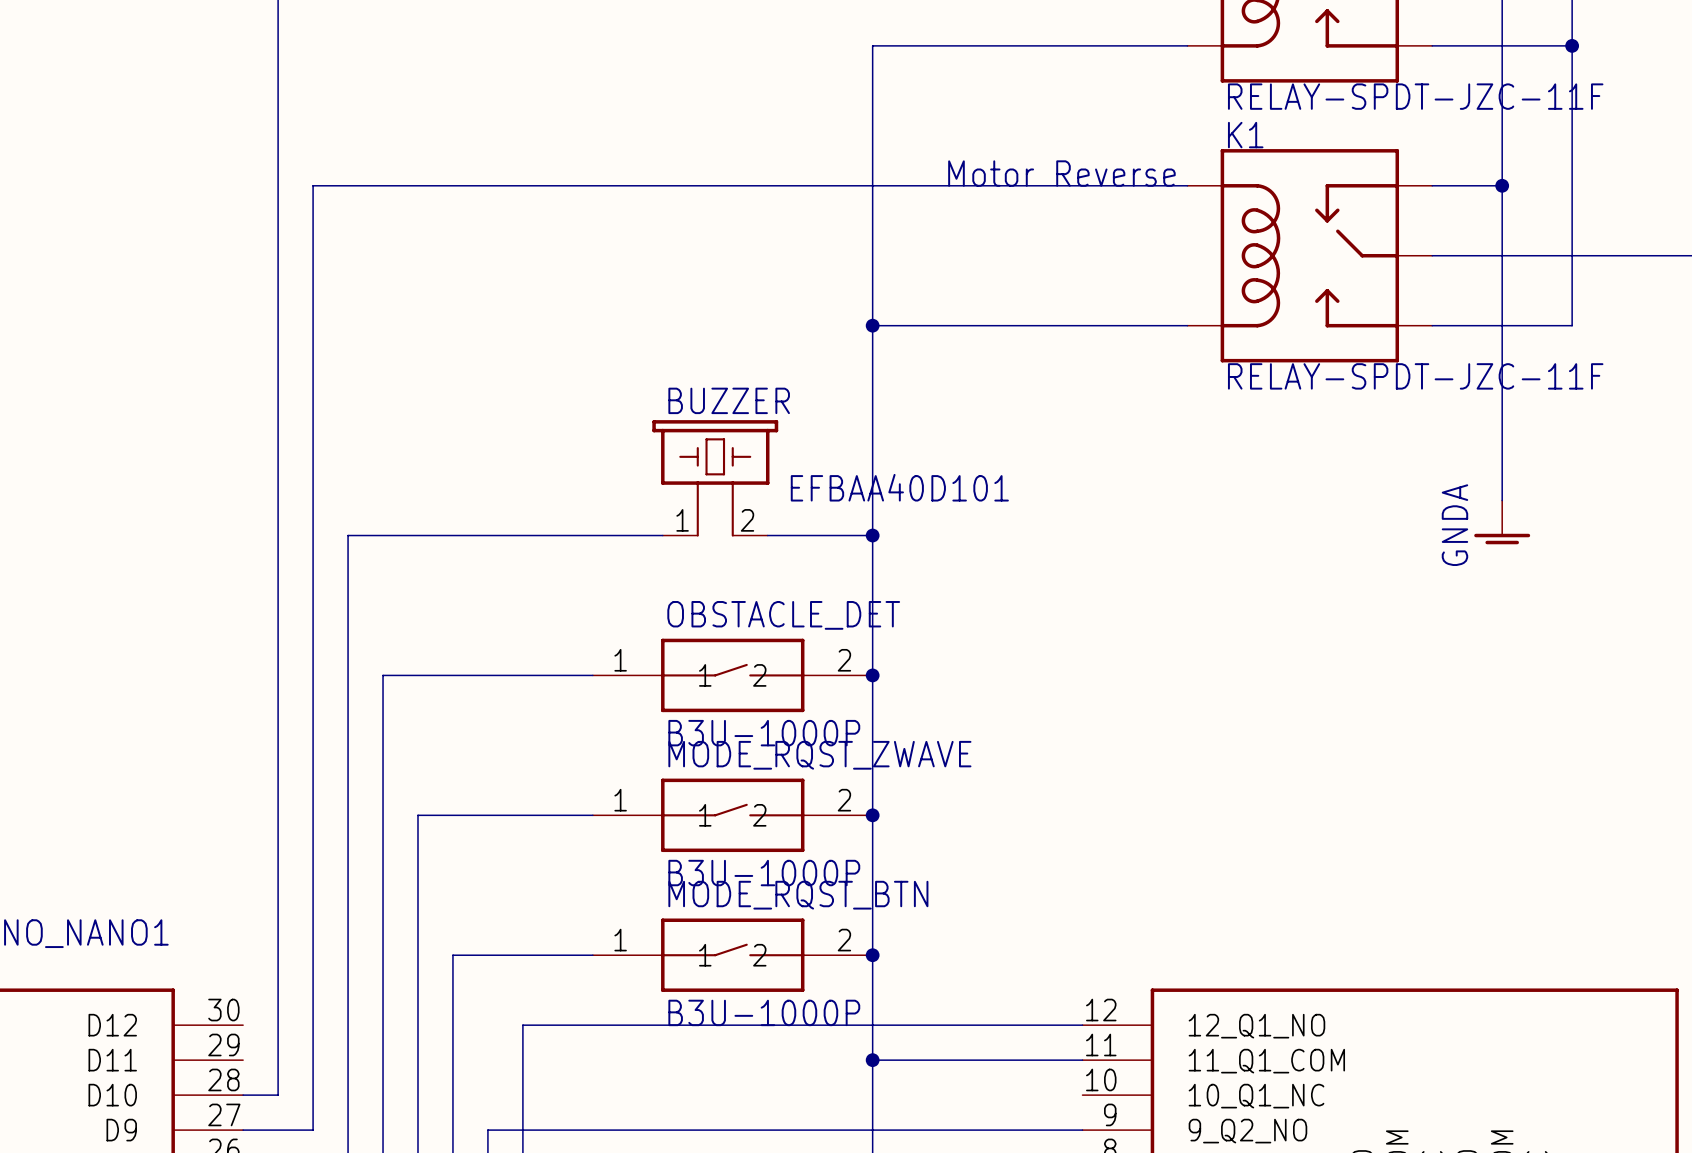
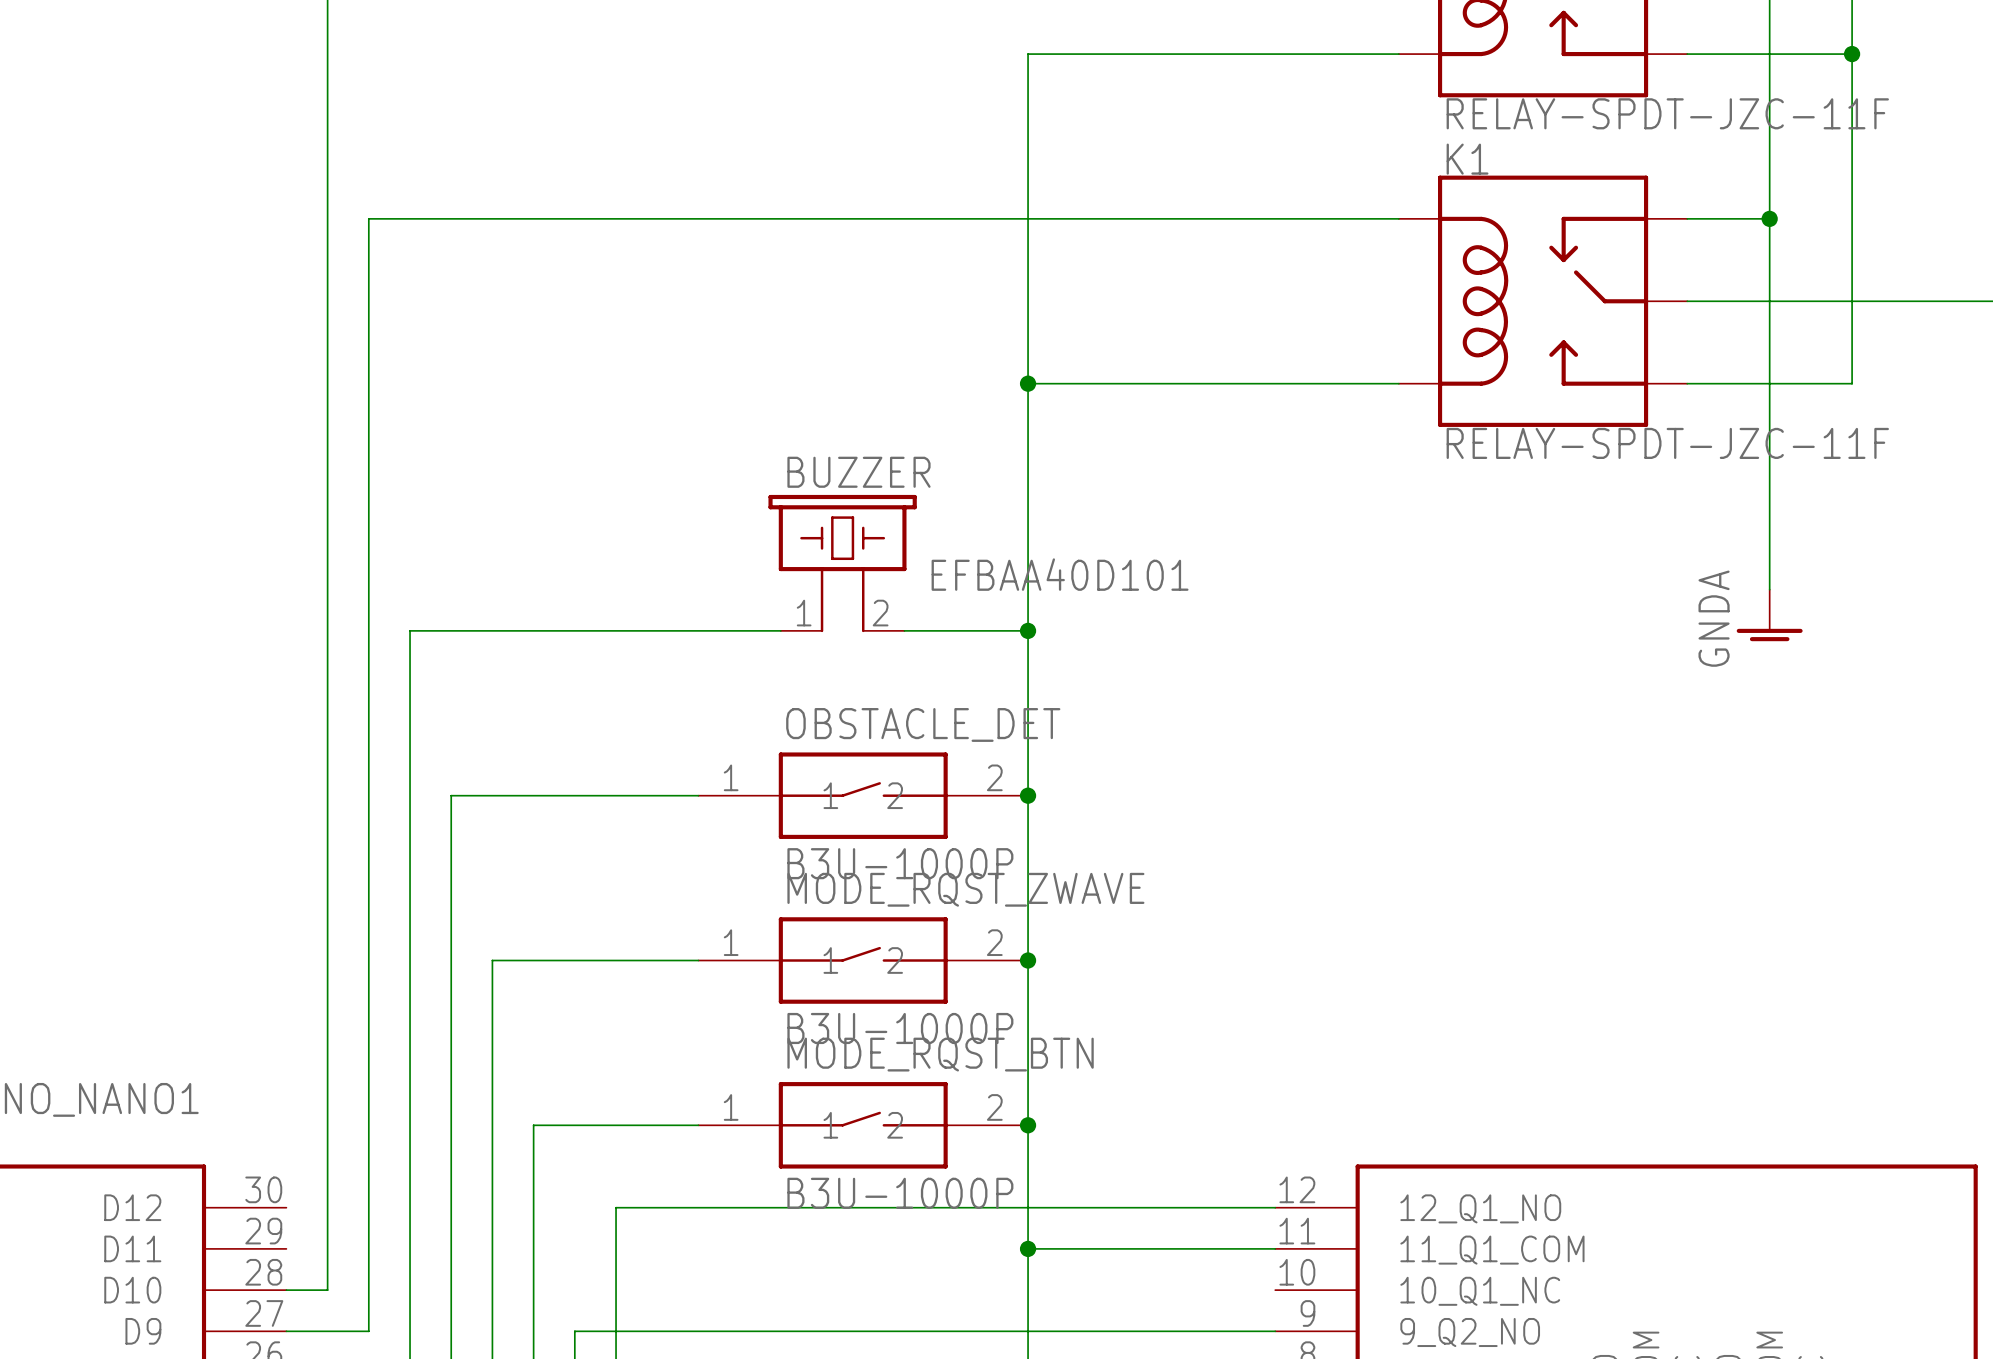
text: Motor Reverse (1061, 173) -> none

